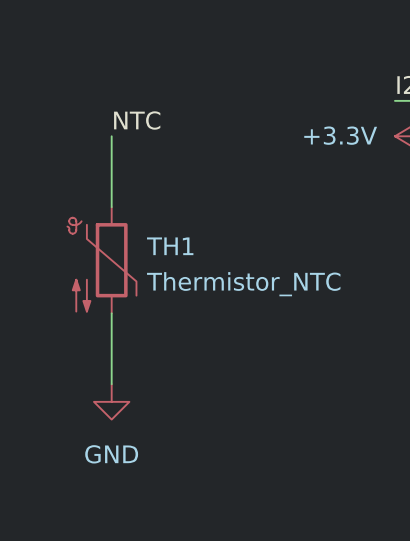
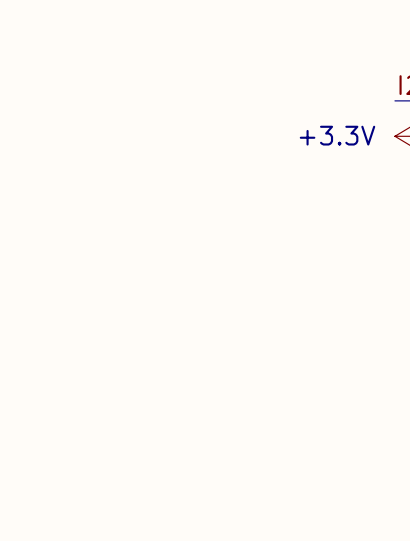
label: NTC (137, 120) -> none
wire: (111, 136) (111, 207) -> none
TH1: Thermistor_NTC (101, 260) -> none
wire: (111, 313) (111, 384) -> none
power symbol: GND (111, 401) -> none

